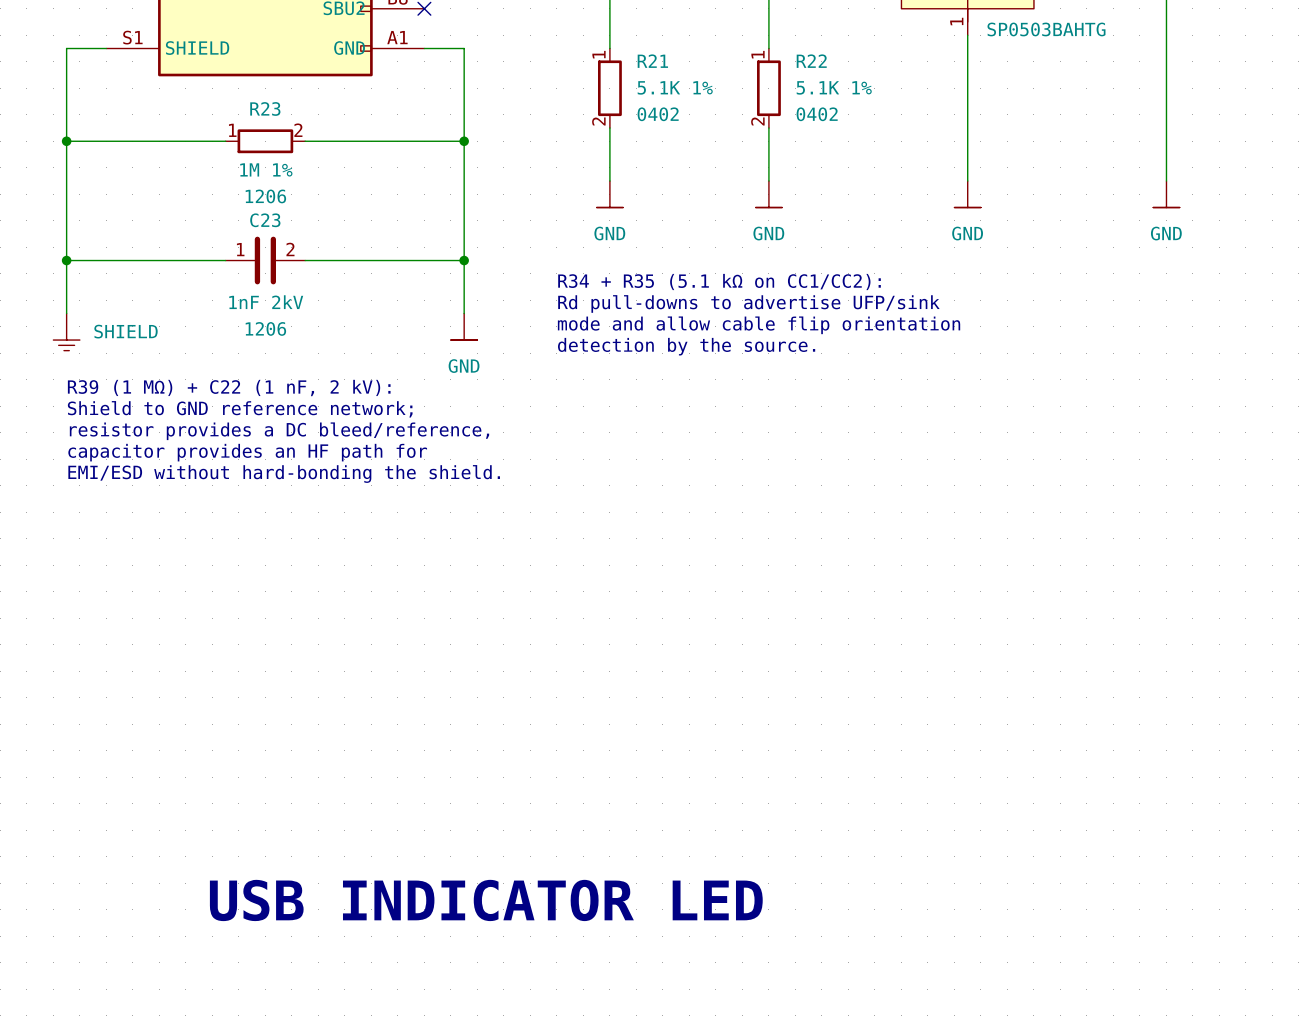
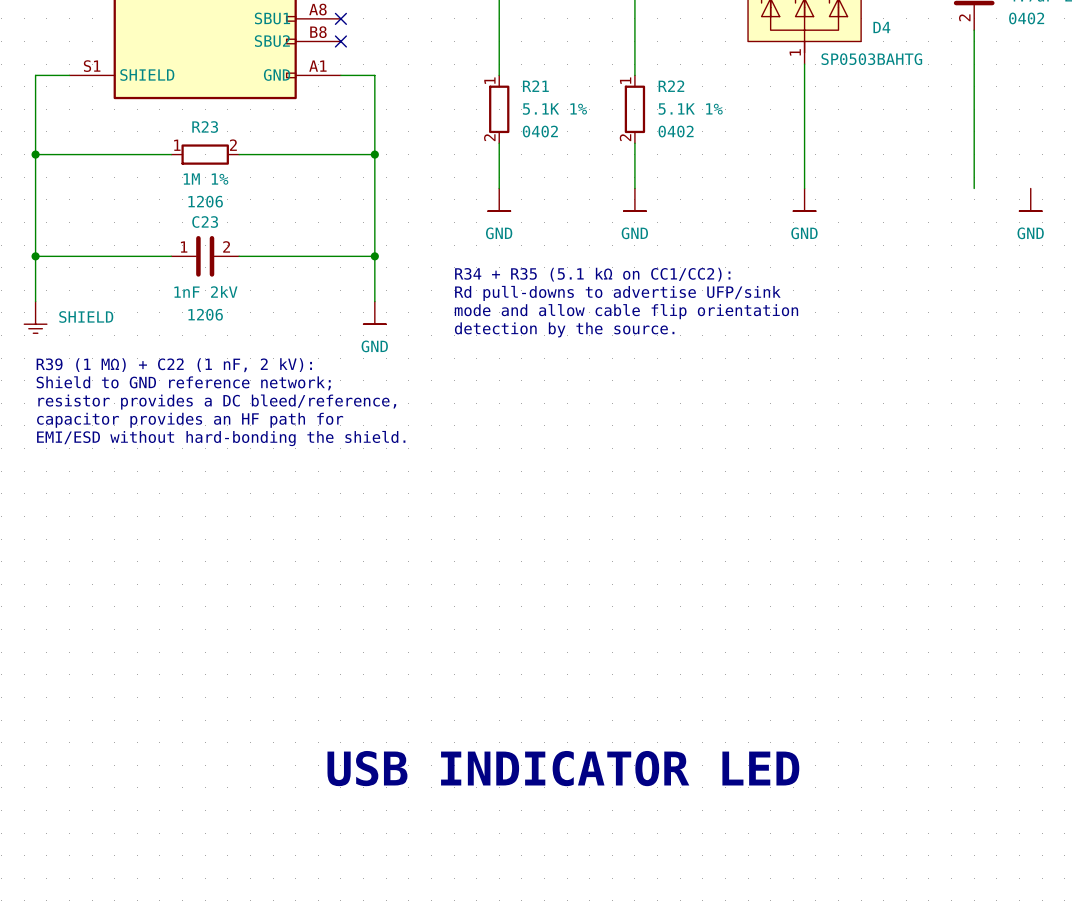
power symbol: GND (1166, 194) -> none
power symbol: none -> GND (1030, 199)
text position: USB INDICATOR LED (486, 900) -> USB INDICATOR LED (563, 768)

